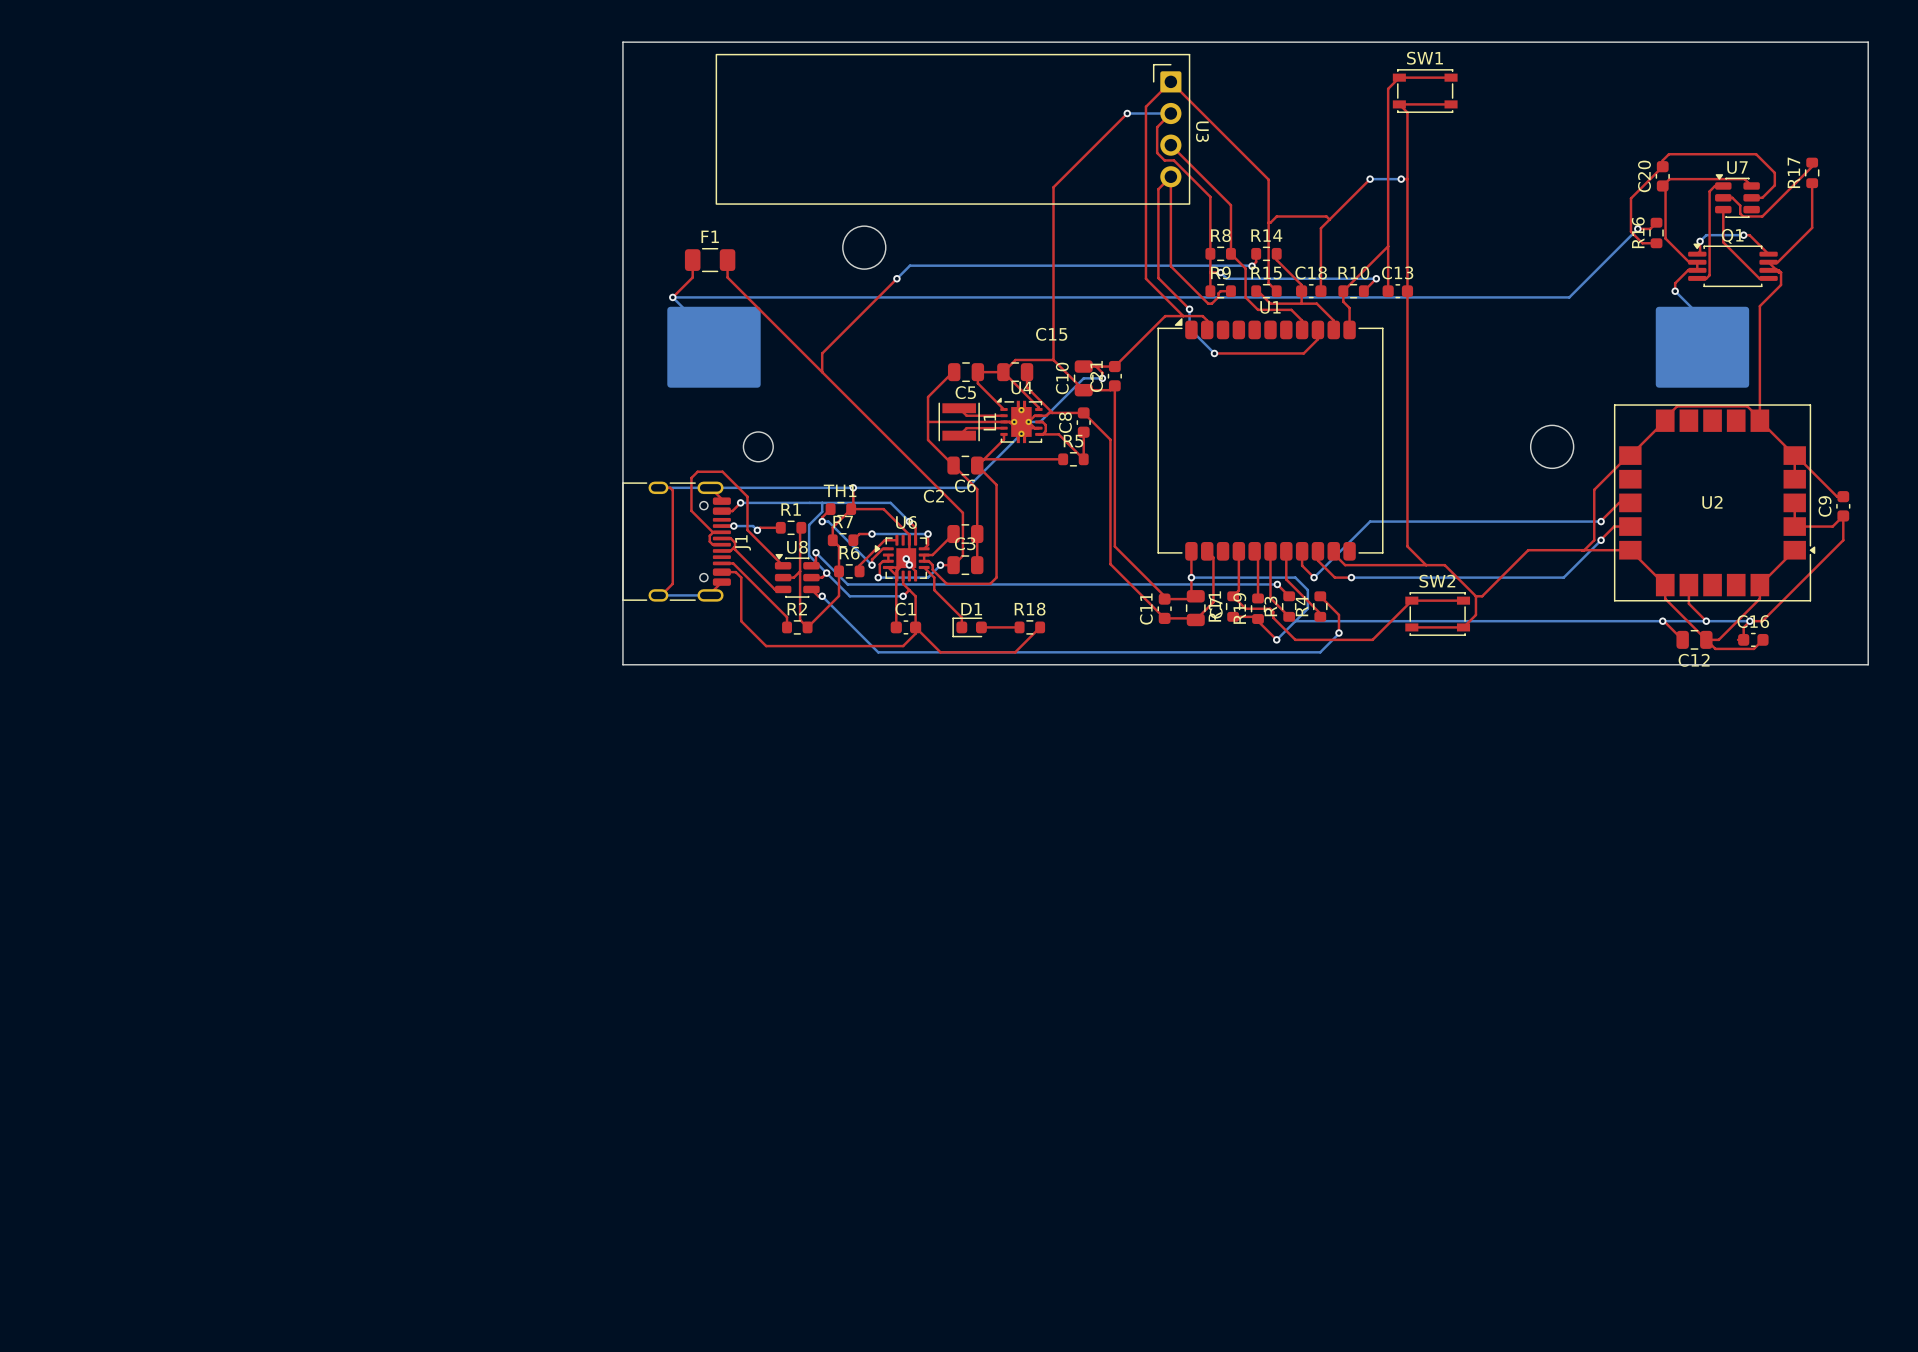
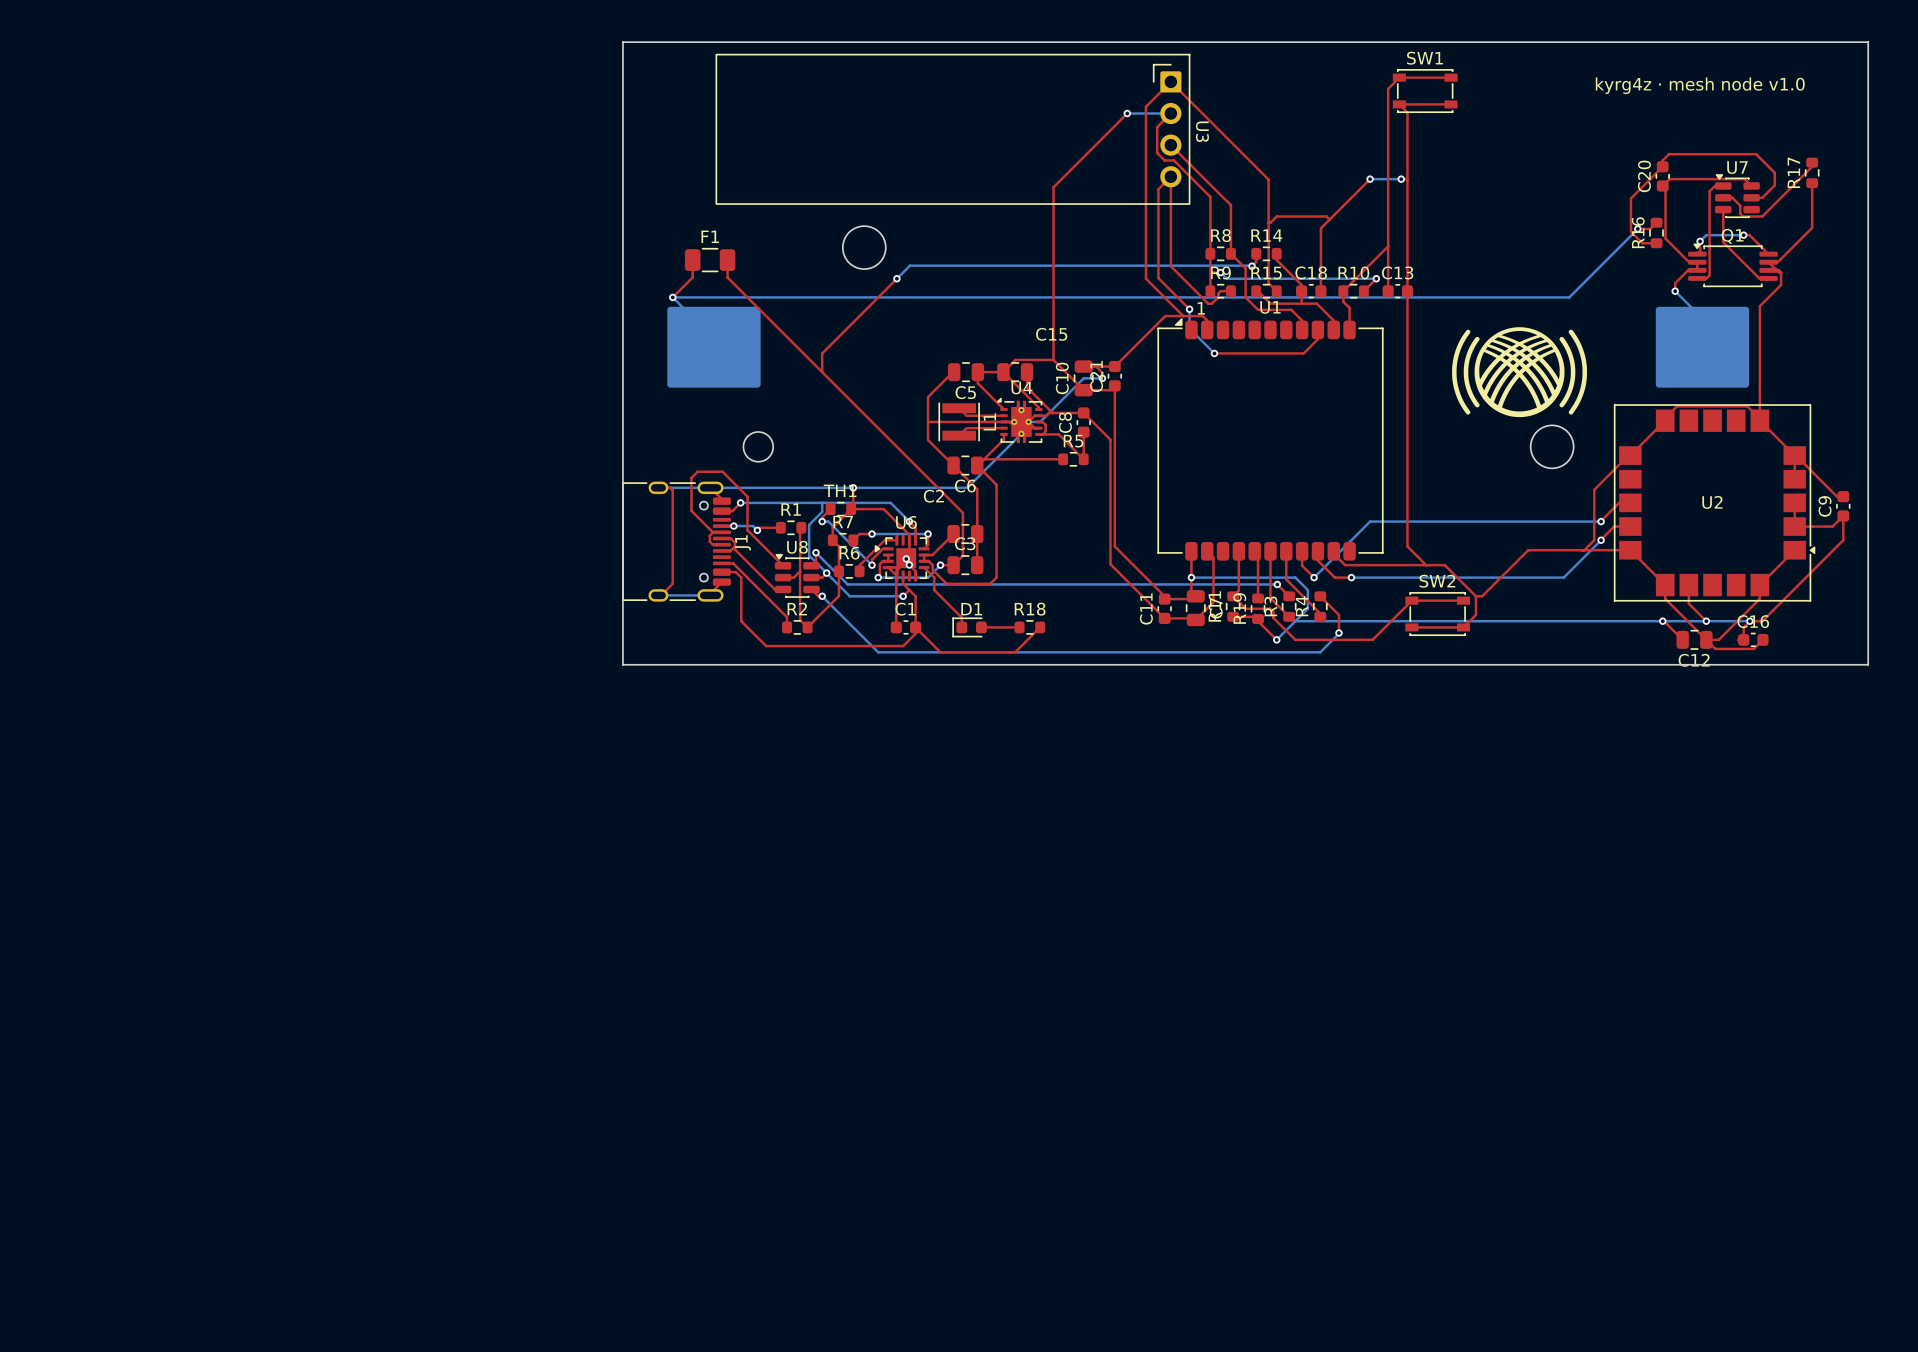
text: none -> kyrg4z · mesh node v1.0 (1700, 85)
text: none -> 1 (1201, 308)
drawing: none -> [1452, 327, 1588, 418]

